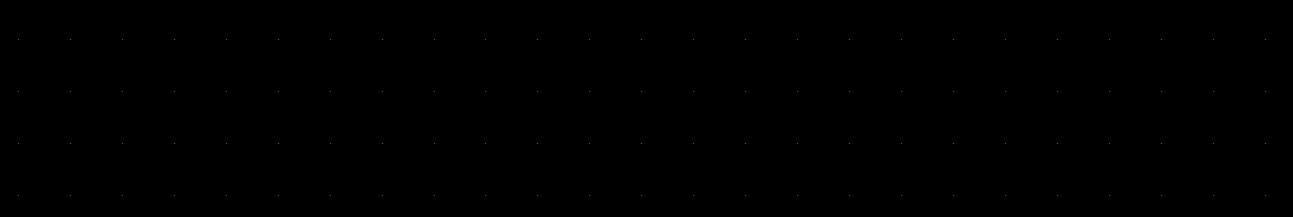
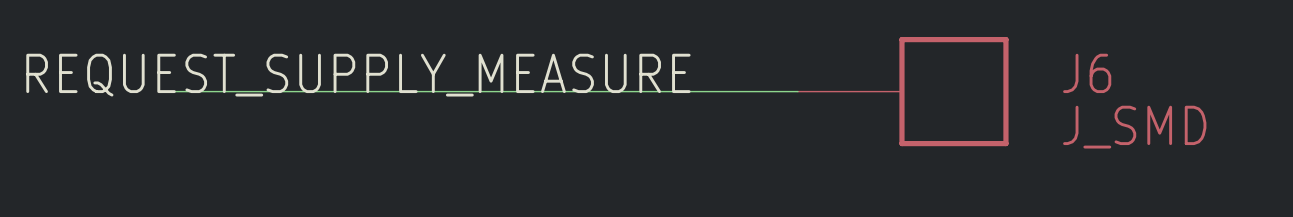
label: none -> REQUEST_SUPPLY_MEASURE (358, 75)
wire: none -> (174, 91) (797, 91)
J6: none -> J_SMD (903, 91)

